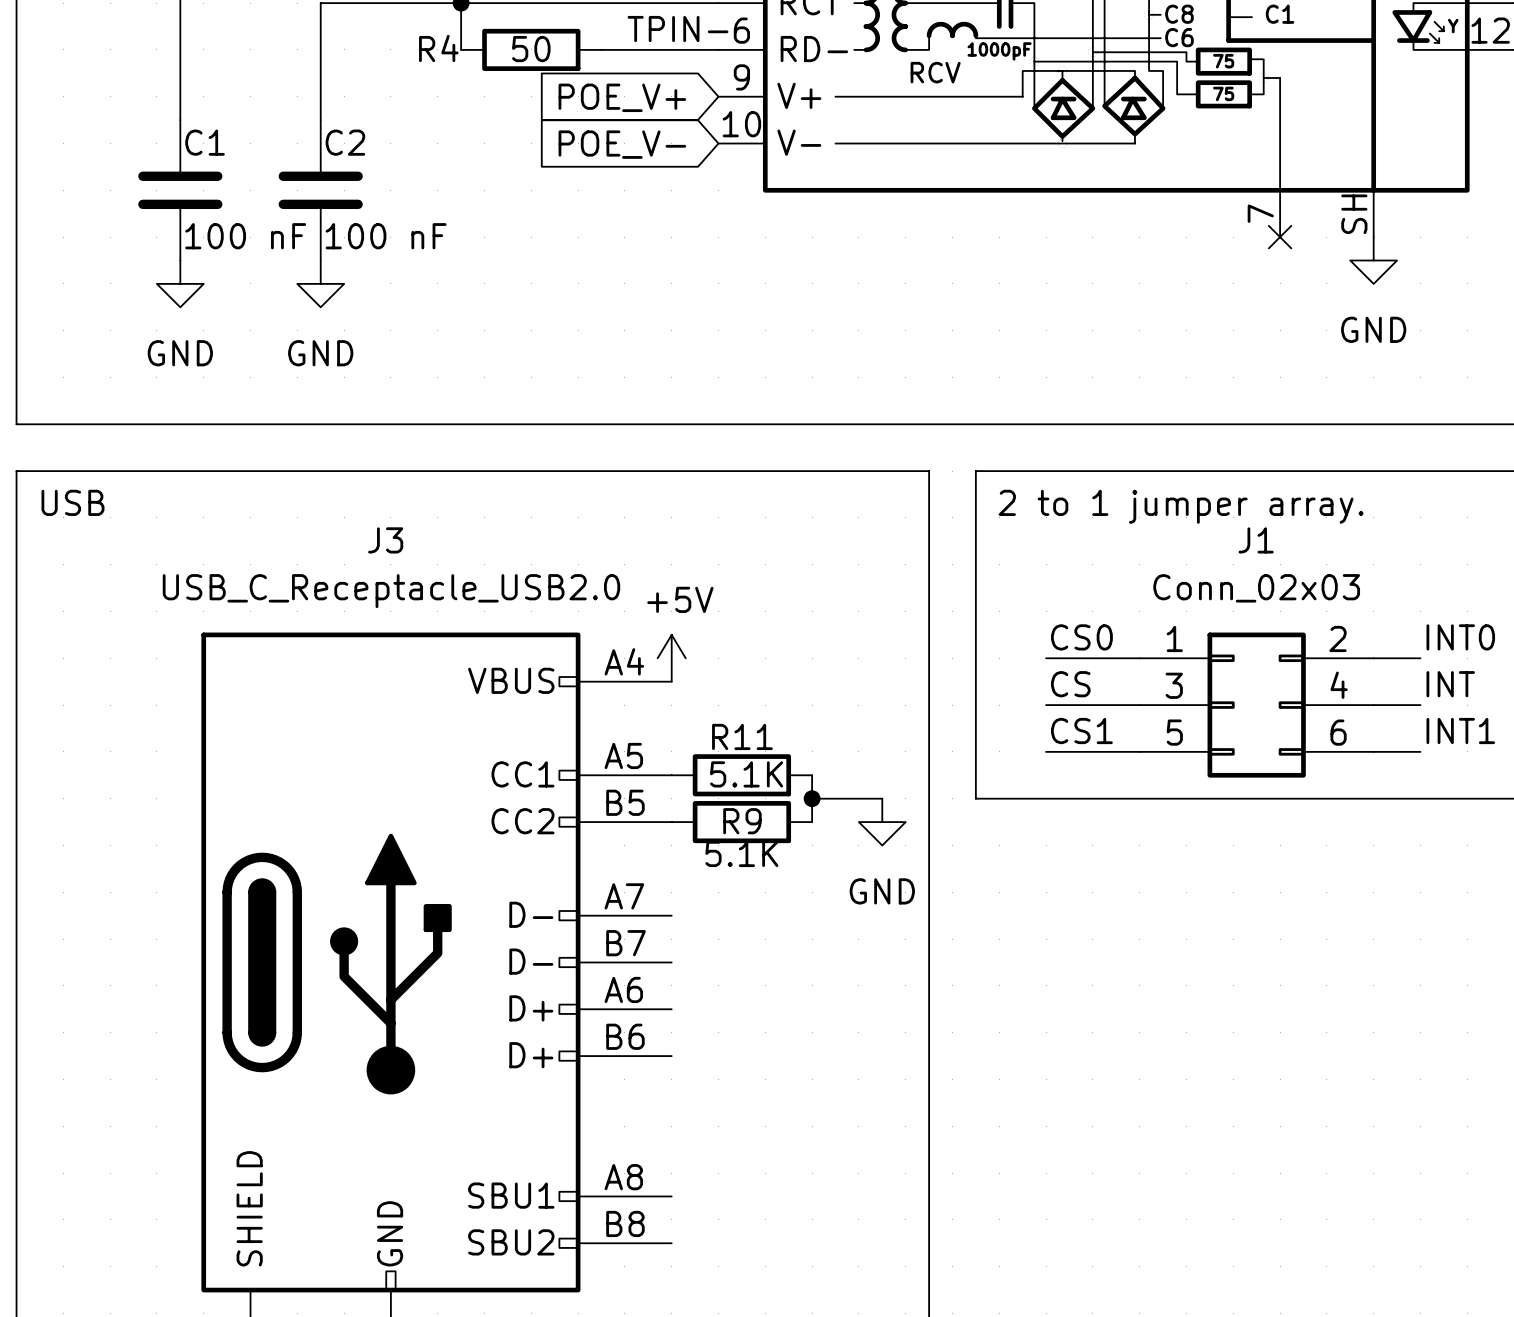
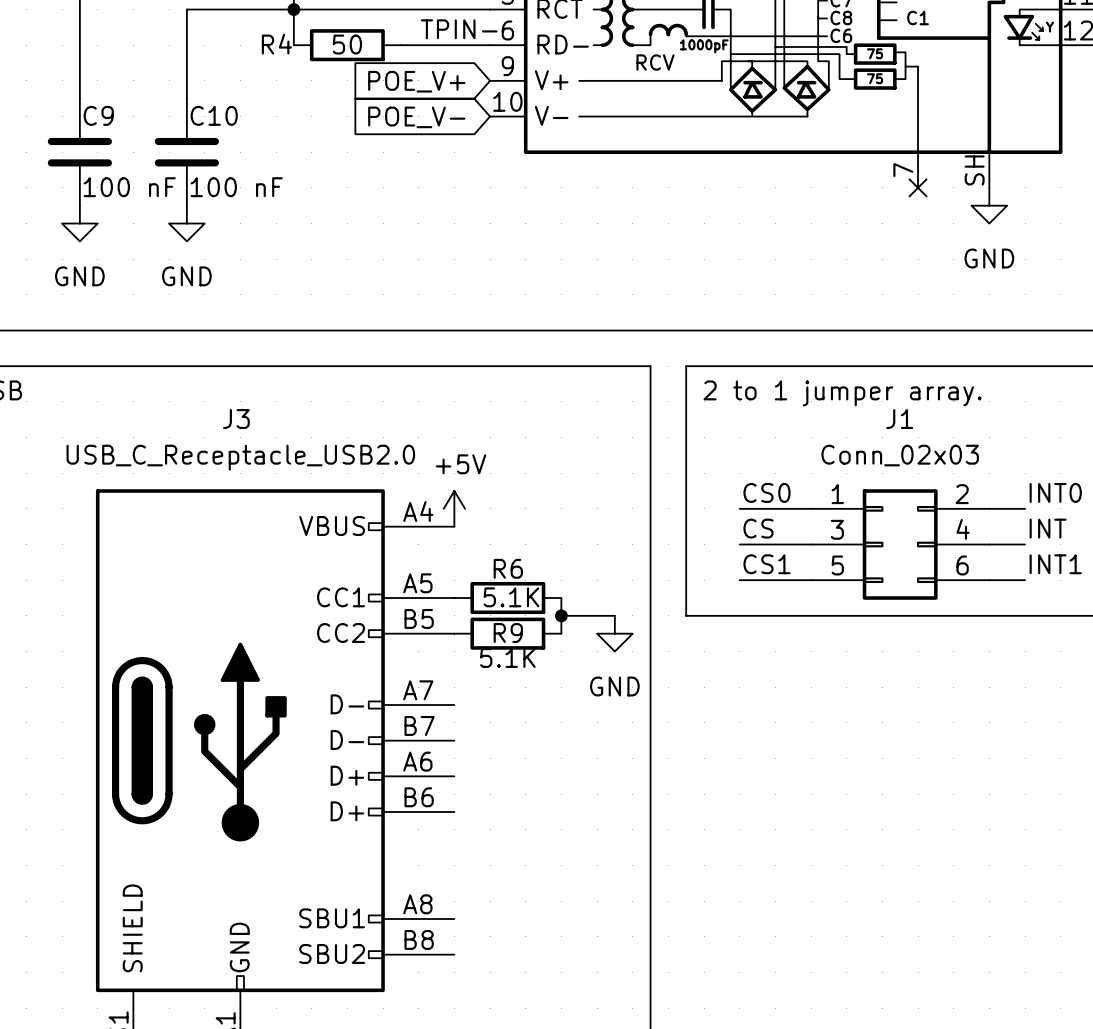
C1 name: C1 (205, 142) -> C9 (98, 115)
C2 name: C2 (345, 142) -> C10 (214, 115)
R11 name: R11 (742, 736) -> R6 (508, 568)

